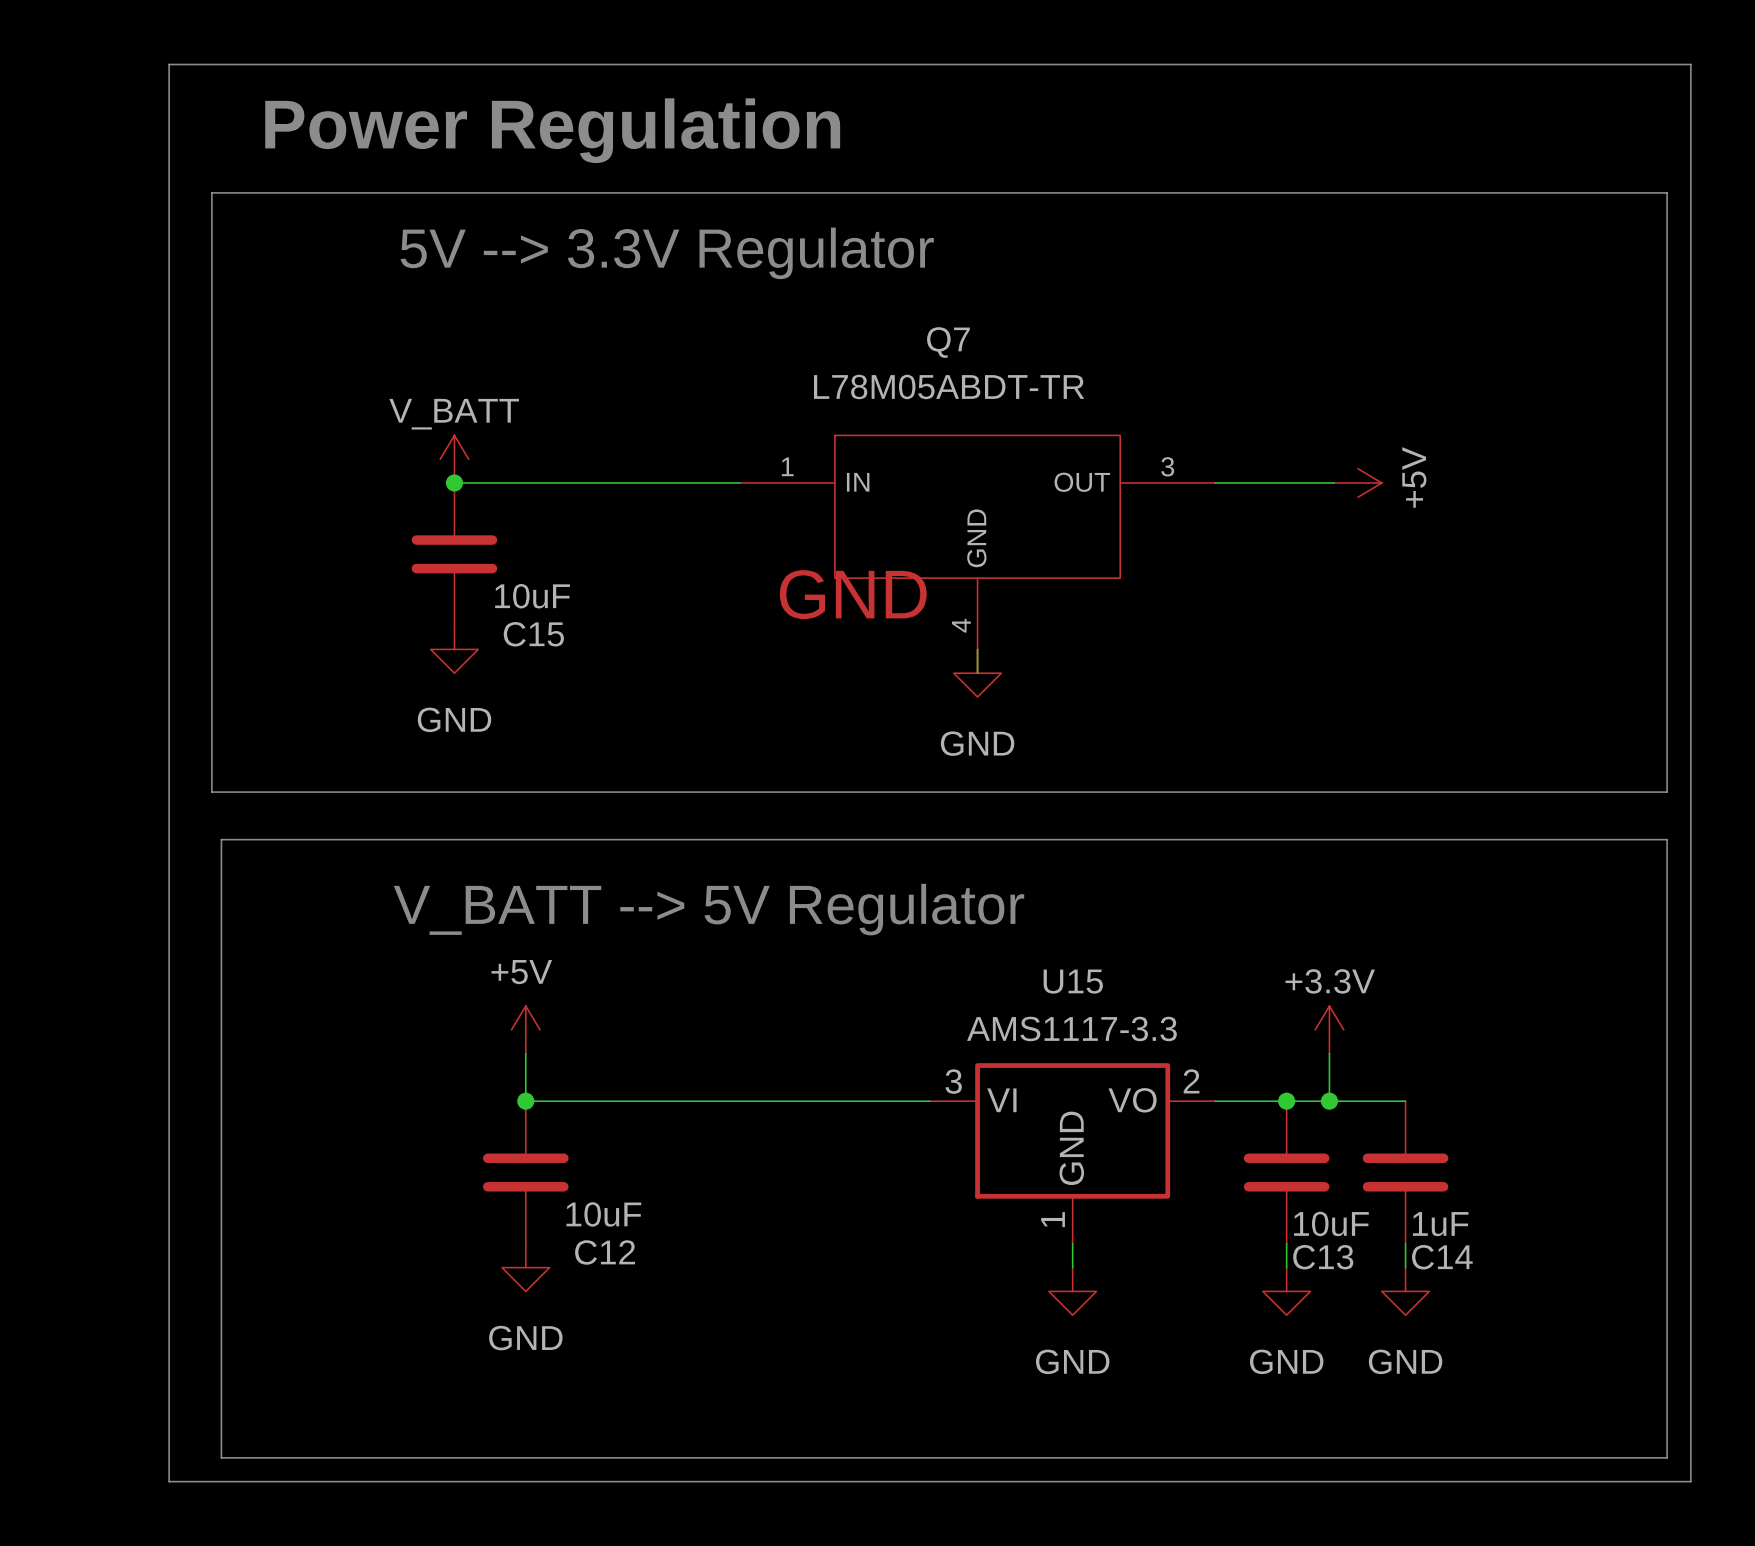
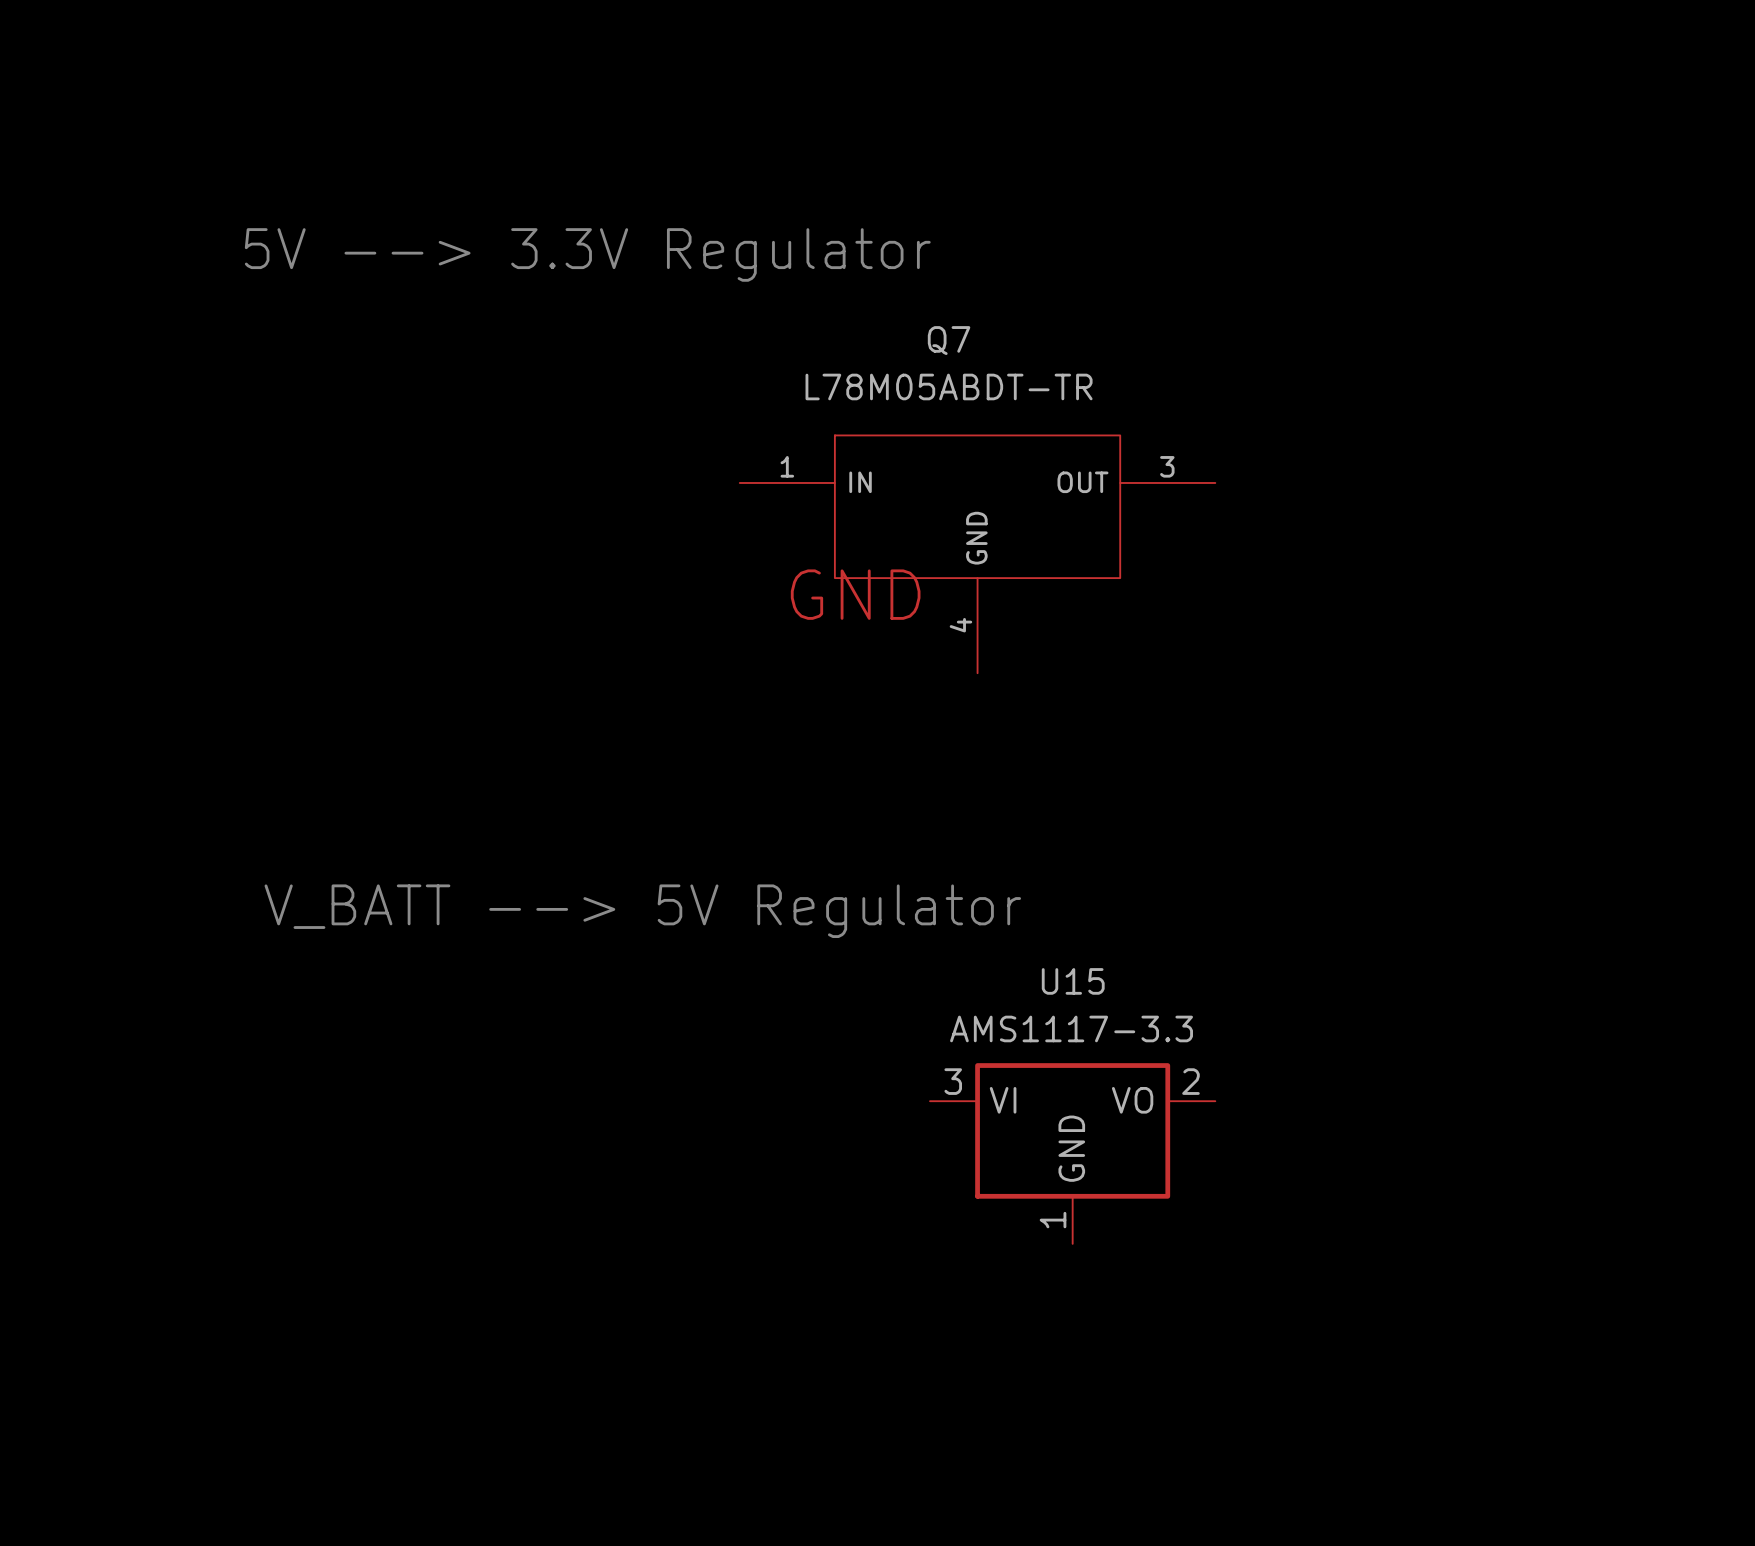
line: (169, 64) (1690, 64) (1690, 1481) (169, 1481) (169, 64) -> none
text: Power Regulation (552, 130) -> none
line: (211, 192) (1667, 192) (1667, 792) (211, 792) (211, 192) -> none
power symbol: V_BATT (454, 459) -> none
wire: (454, 482) (739, 482) -> none
junction: (454, 482) -> none
wire: (1215, 482) (1334, 482) -> none
power symbol: +5V (1357, 482) -> none
C15: 10uF (454, 554) -> none
power symbol: GND (454, 649) -> none
power symbol: GND (977, 673) -> none
line: (221, 839) (1667, 839) (1667, 1457) (221, 1457) (221, 839) -> none
power symbol: +5V (525, 1029) -> none
power symbol: +3.3V (1329, 1029) -> none
wire: (525, 1053) (525, 1101) (930, 1101) -> none
wire: (1329, 1053) (1329, 1101) -> none
junction: (525, 1101) -> none
wire: (1215, 1101) (1405, 1101) -> none
junction: (1286, 1101) -> none
junction: (1329, 1101) -> none
C12: 10uF (525, 1172) -> none
C13: 10uF (1286, 1172) -> none
C14: 1uF (1405, 1172) -> none
wire: (1072, 1243) (1072, 1267) -> none
wire: (1286, 1243) (1286, 1267) -> none
wire: (1405, 1243) (1405, 1267) -> none
power symbol: GND (525, 1267) -> none
power symbol: GND (1072, 1291) -> none
power symbol: GND (1286, 1291) -> none
power symbol: GND (1405, 1291) -> none

